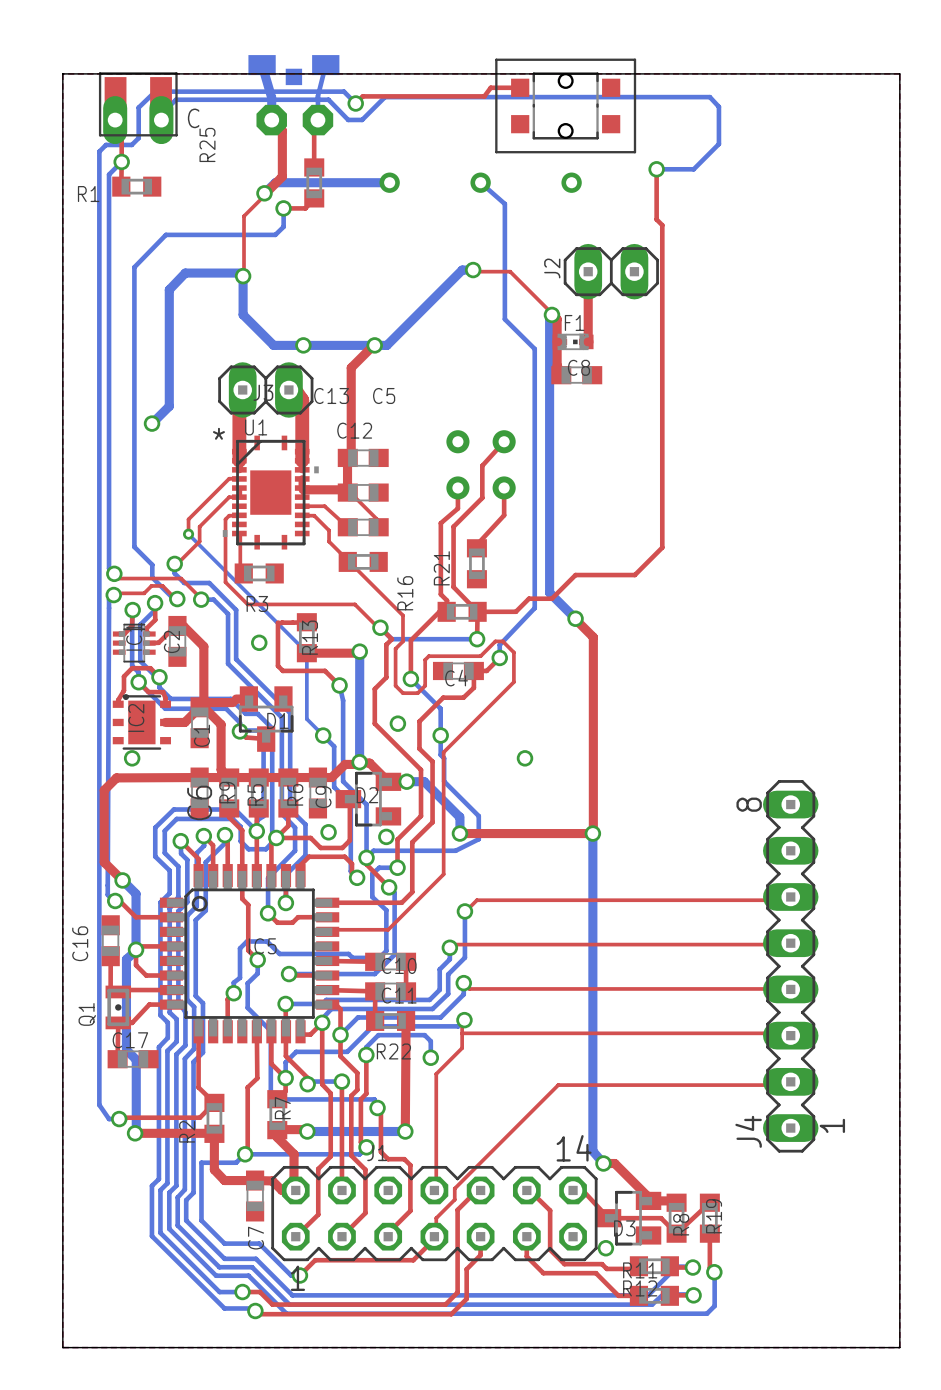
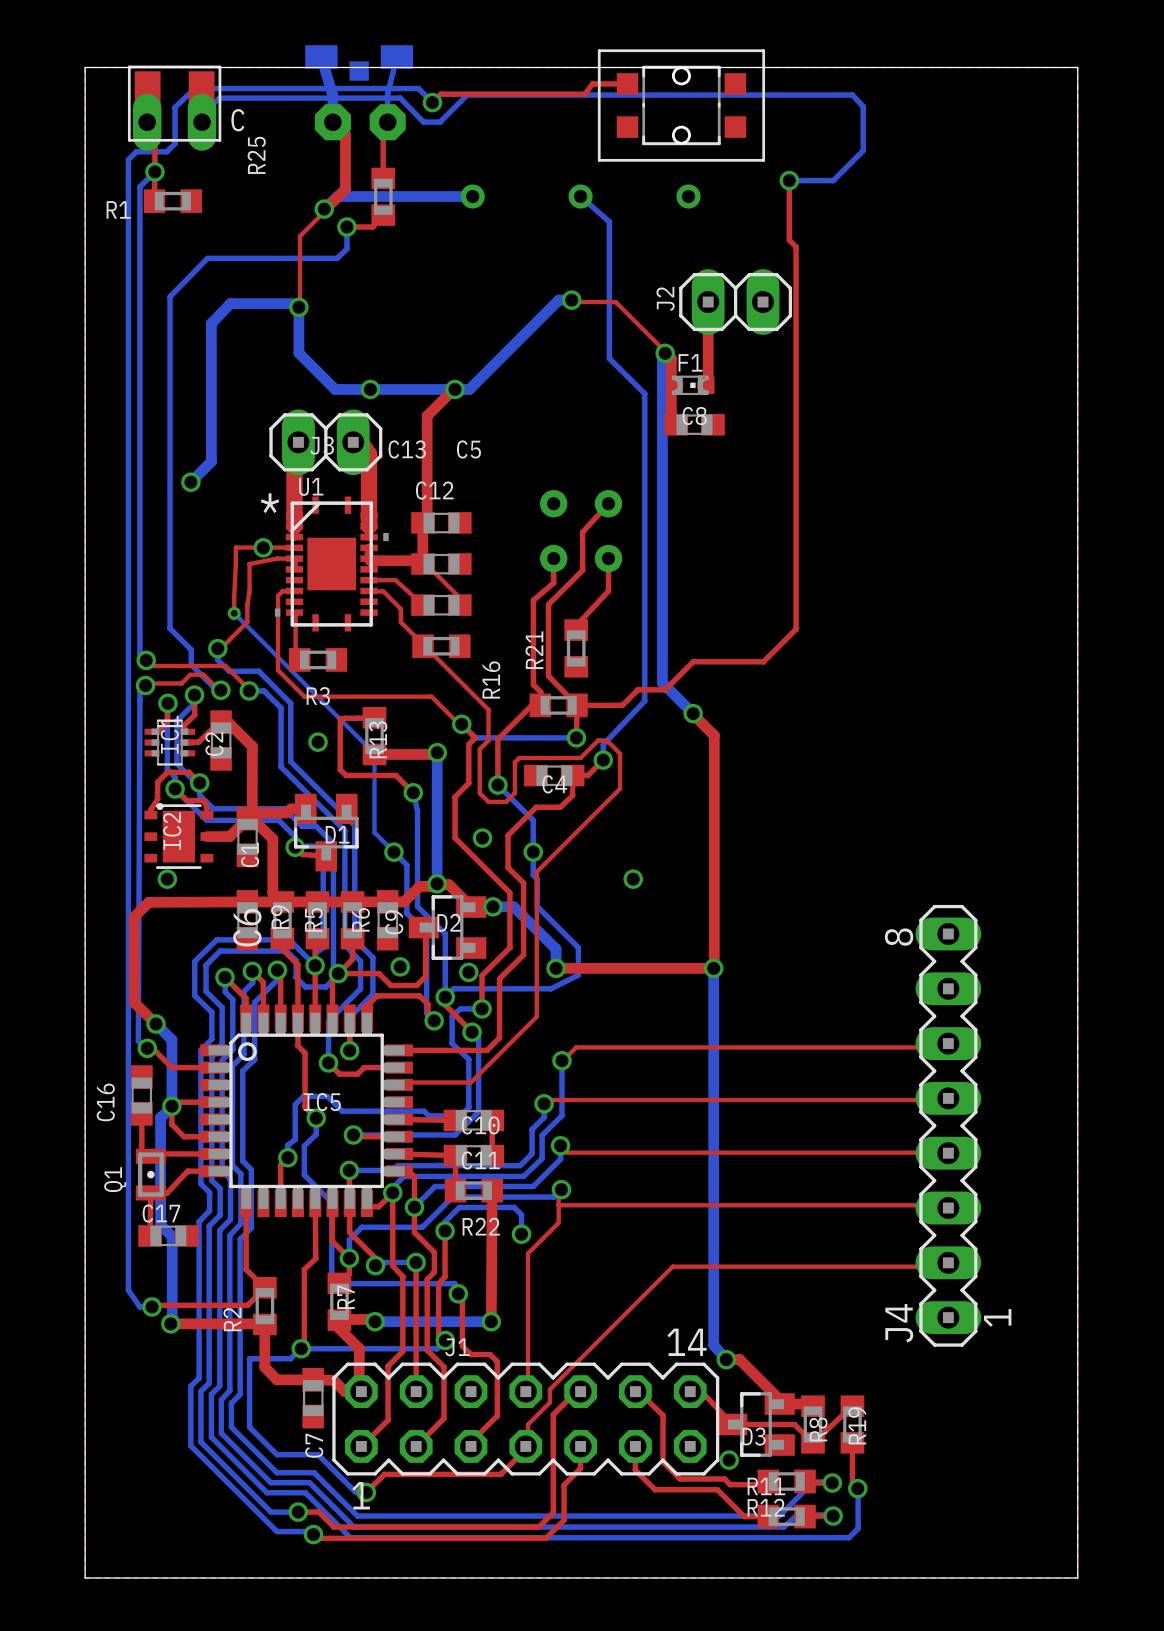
via: none -> (263, 547)
top track: (229, 478) (188, 519) -> (282, 547) (235, 547) (234, 595)
top track: (236, 497) (229, 497) (199, 526) -> (294, 558) (276, 558) (249, 564) (247, 604)

